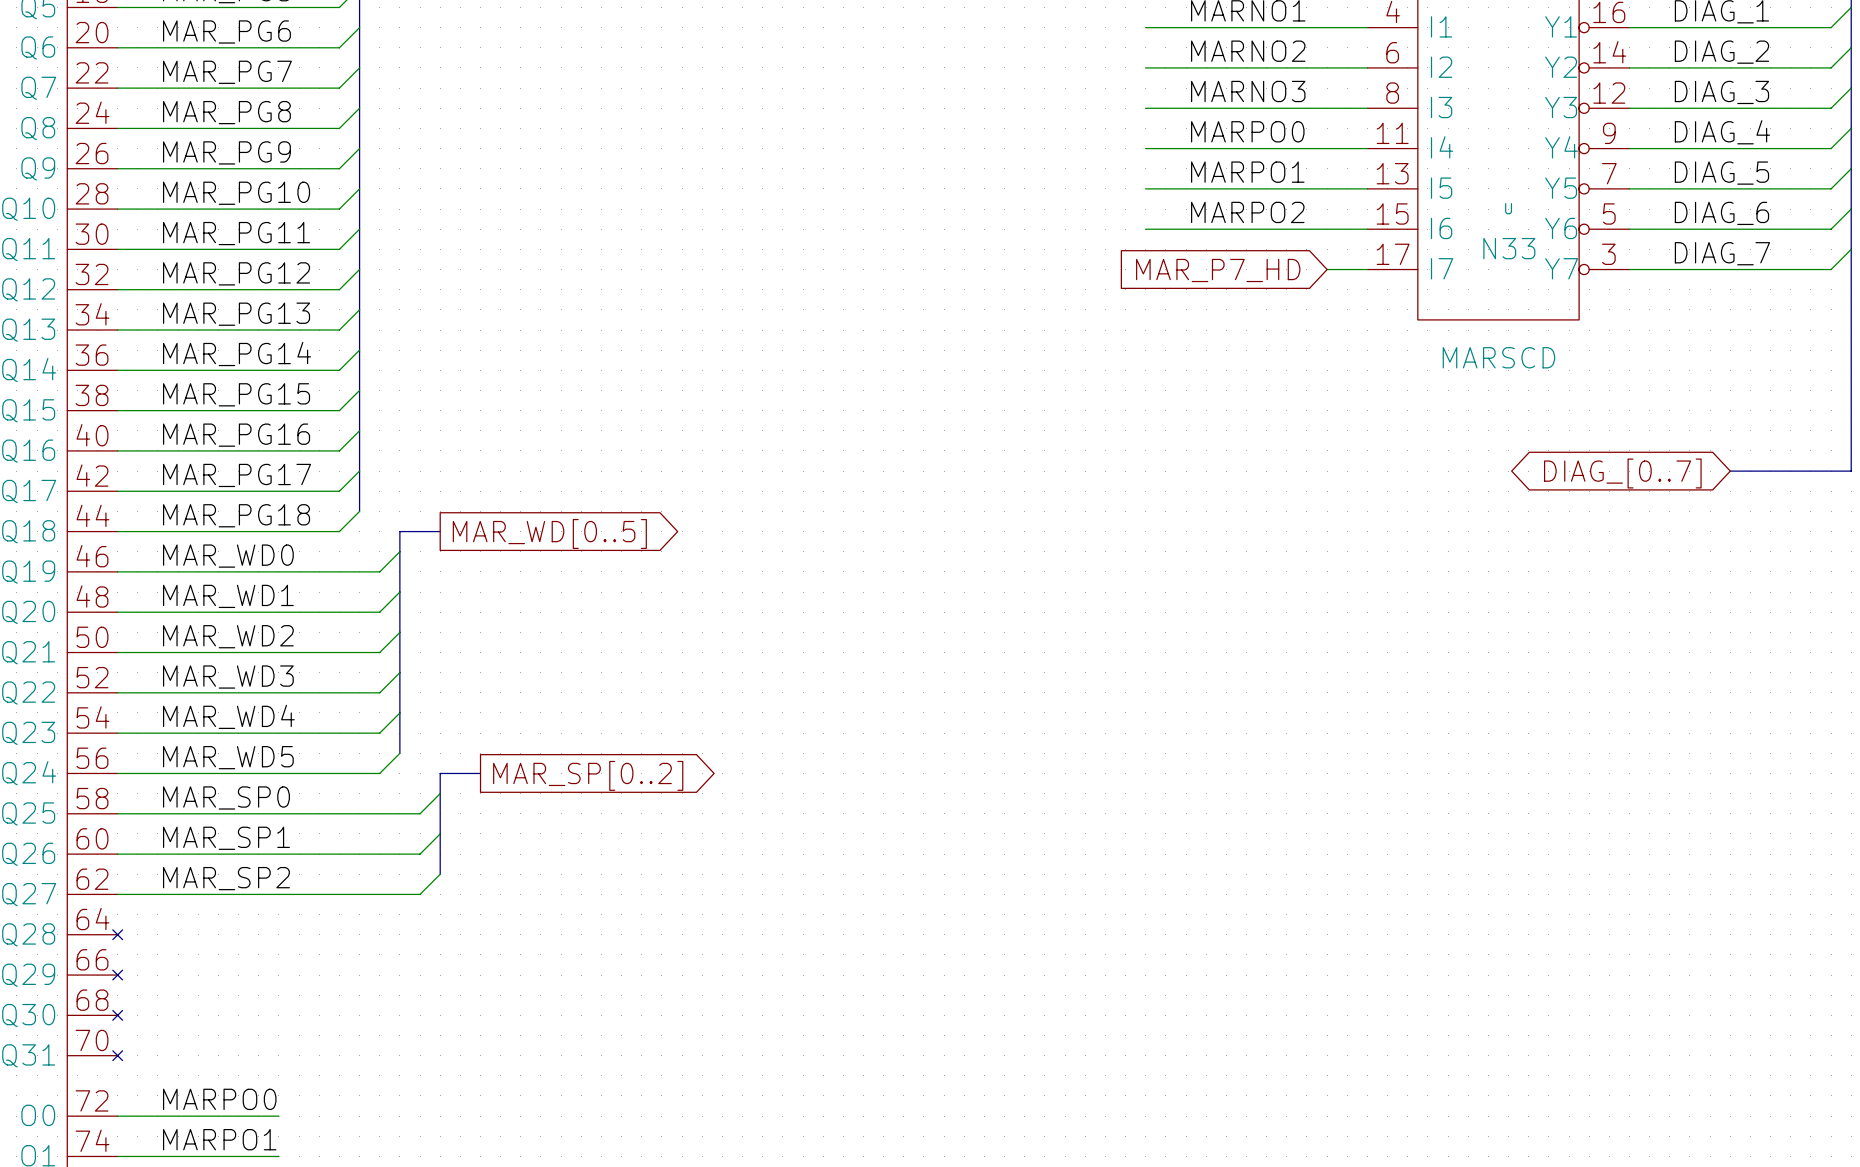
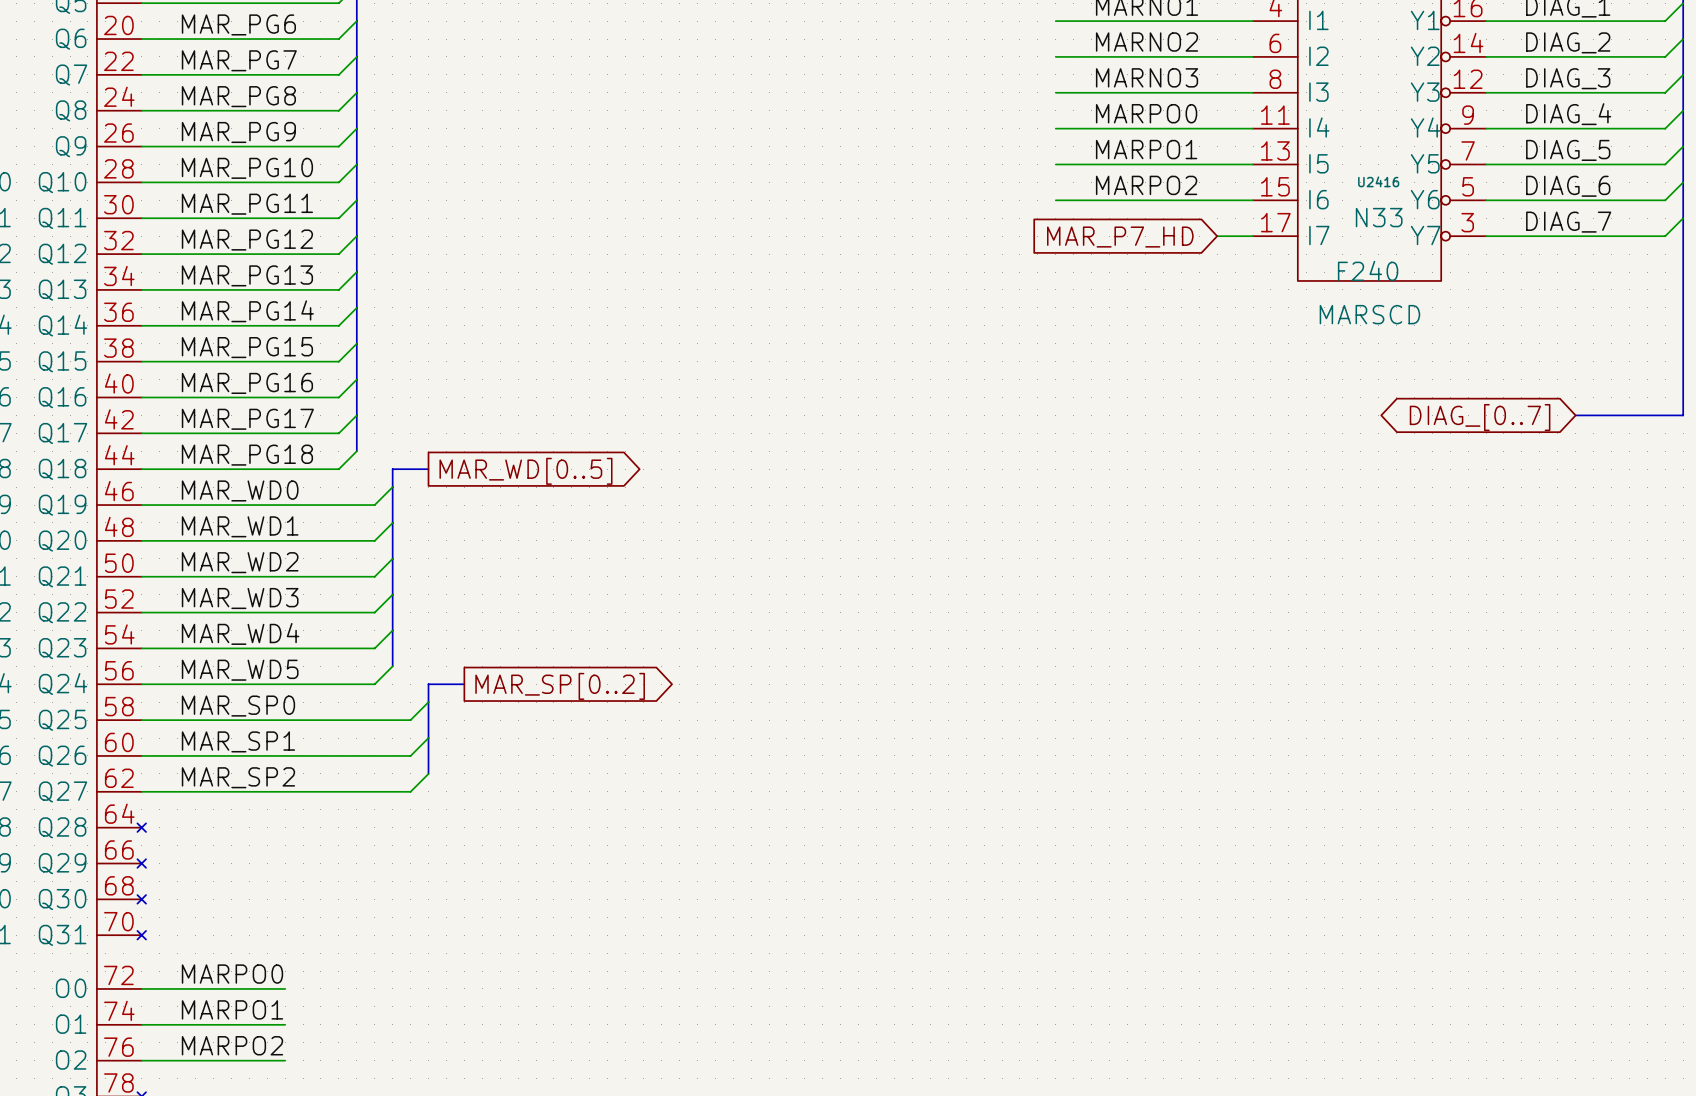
U name: U (1508, 208) -> U2416 (1378, 181)
U value: none -> F240 (1368, 270)

